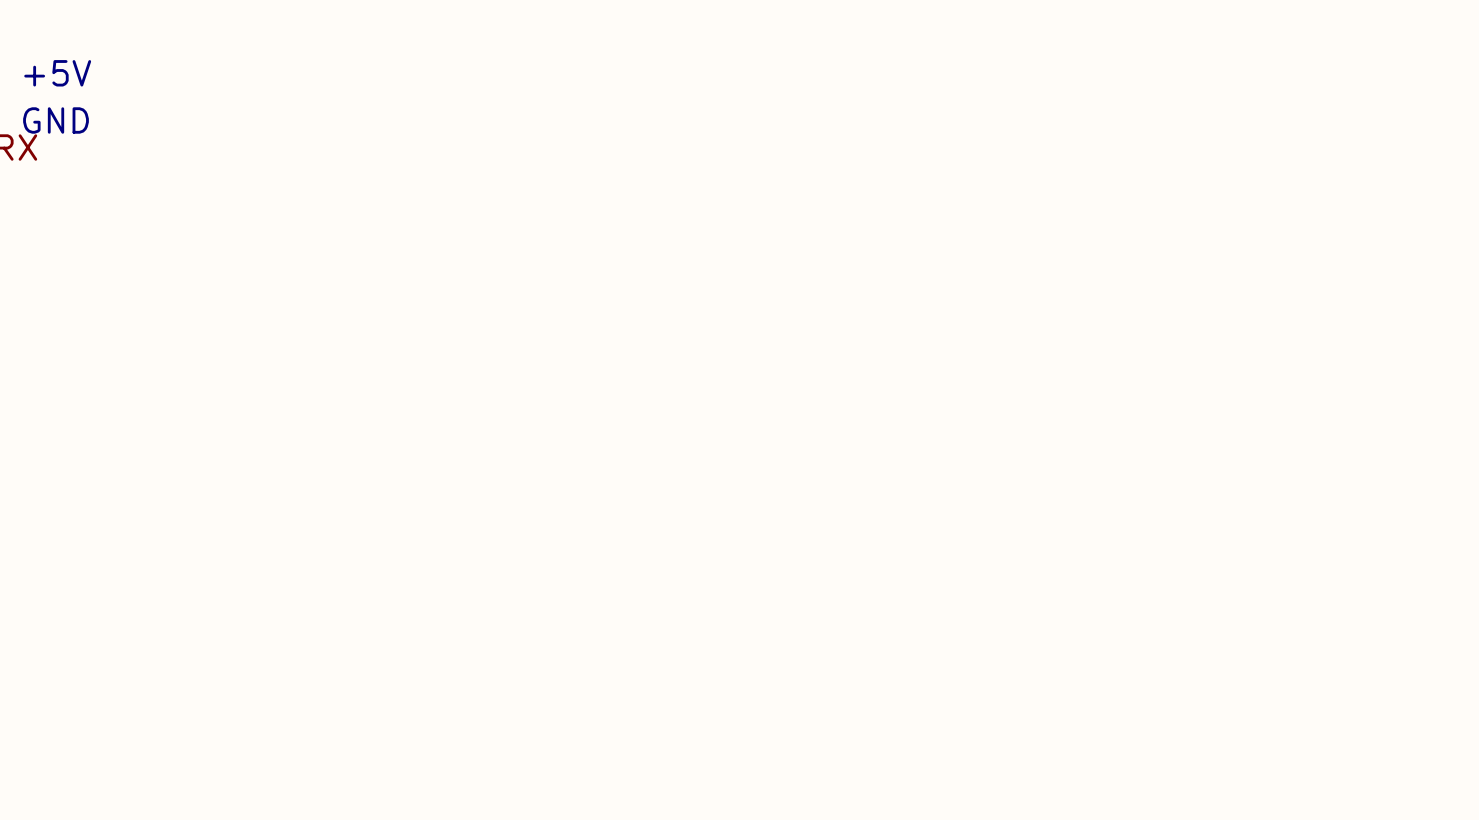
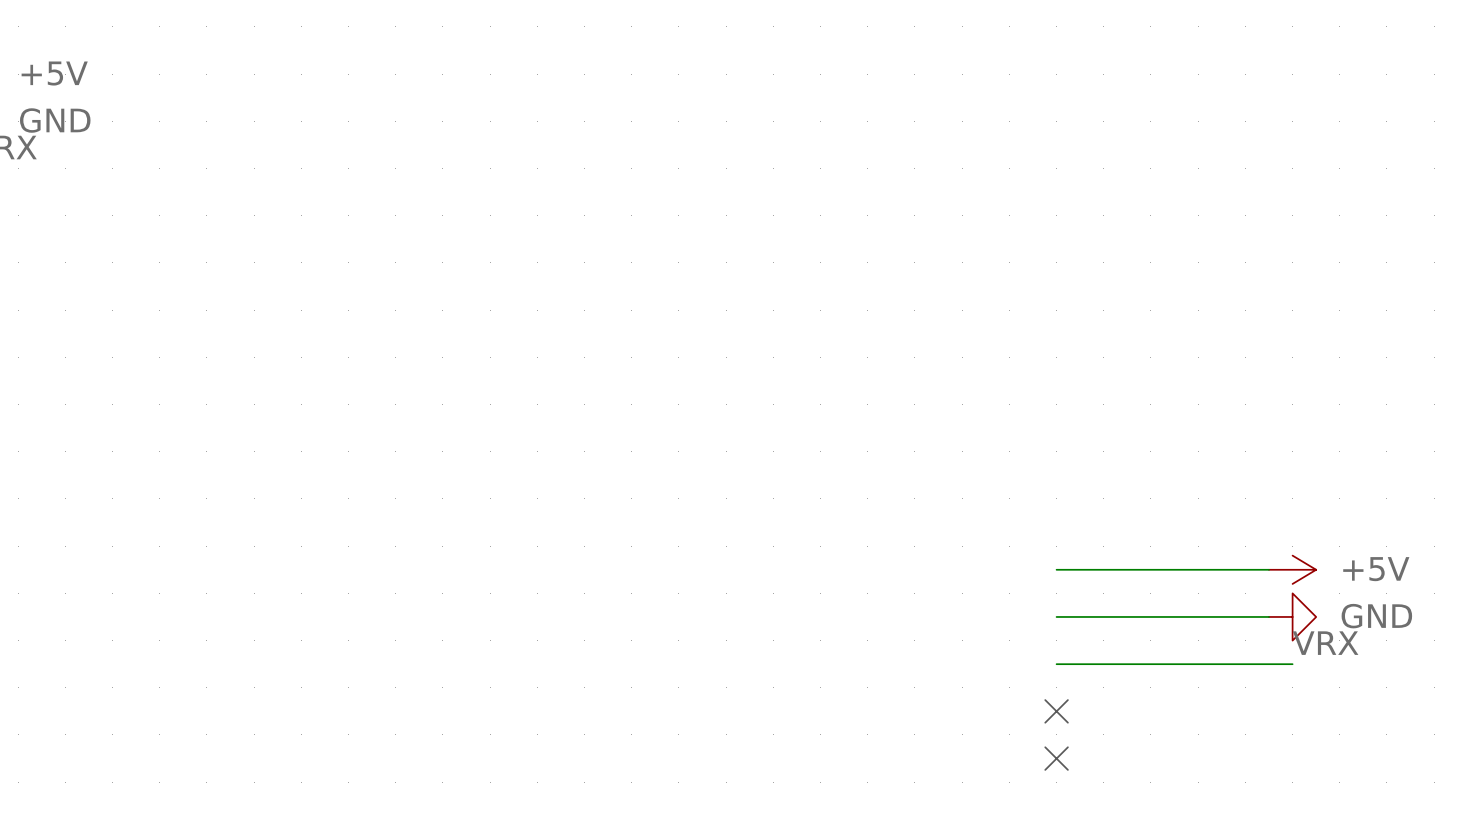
wire: none -> (1056, 569) (1268, 569)
power symbol: none -> +5V (1292, 569)
wire: none -> (1056, 616) (1268, 616)
power symbol: none -> GND (1292, 616)
label: none -> VRX (1325, 643)
wire: none -> (1056, 664) (1292, 664)
no-connect mark: none -> (1056, 711)
no-connect mark: none -> (1056, 758)

